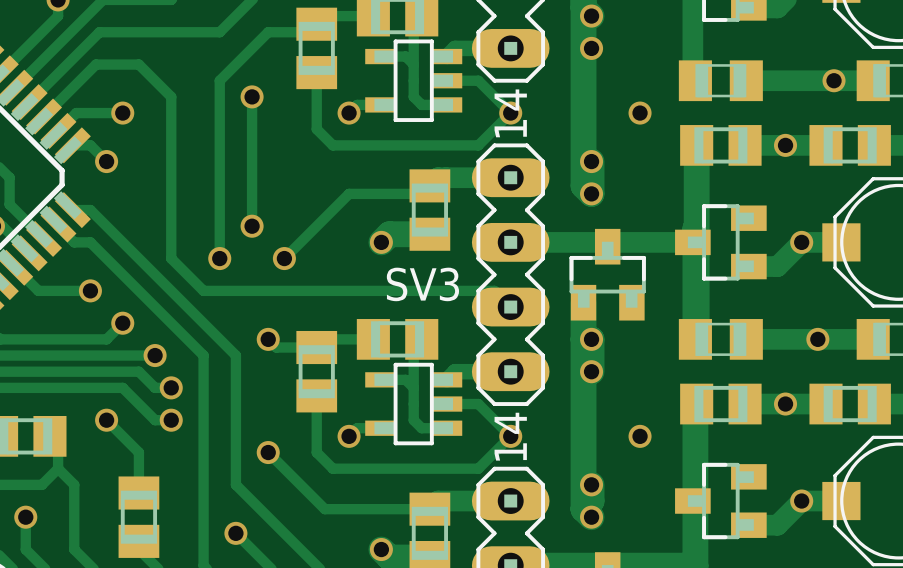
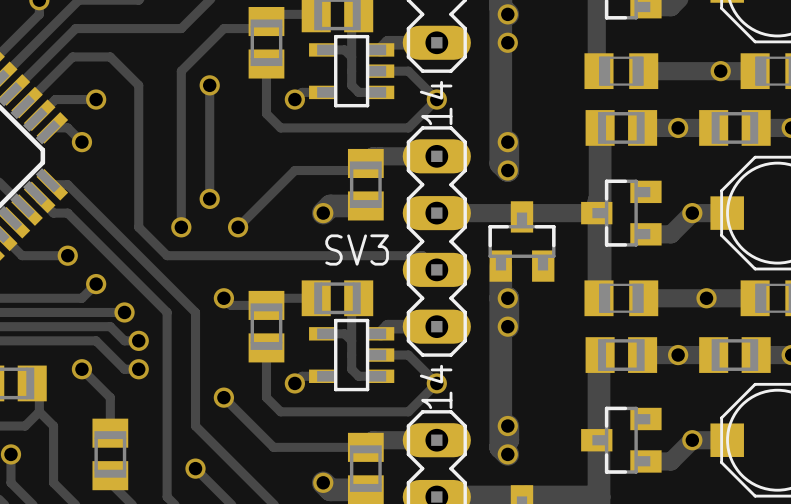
via: (640, 113) -> none
via: (640, 436) -> none

